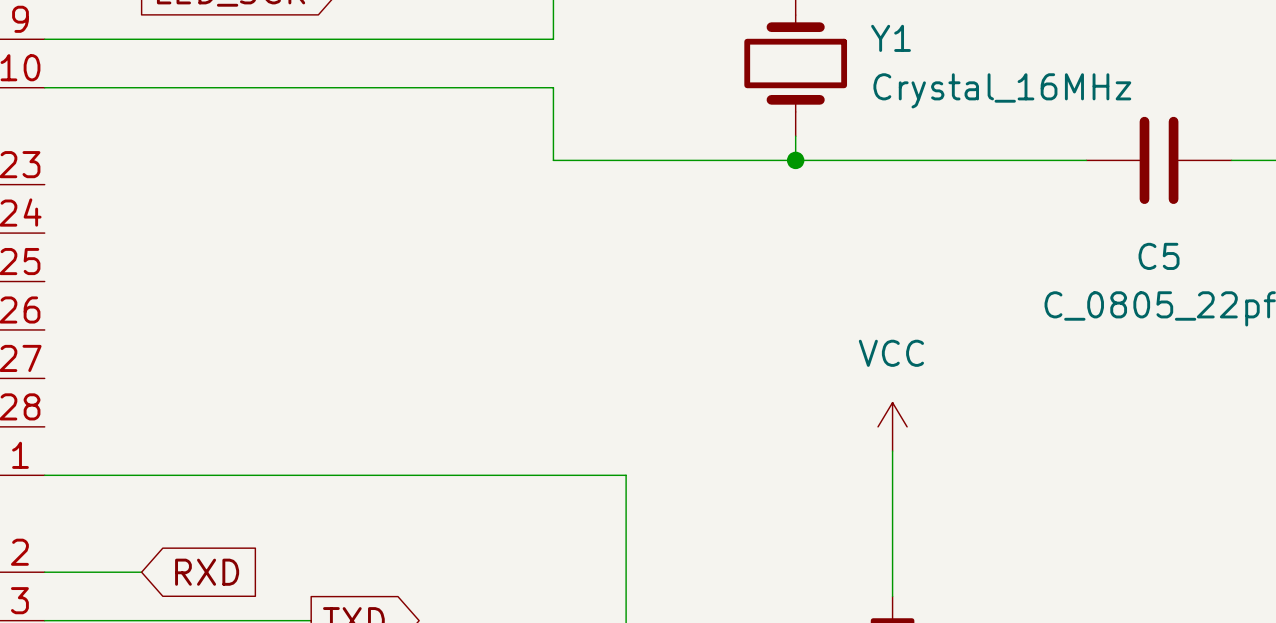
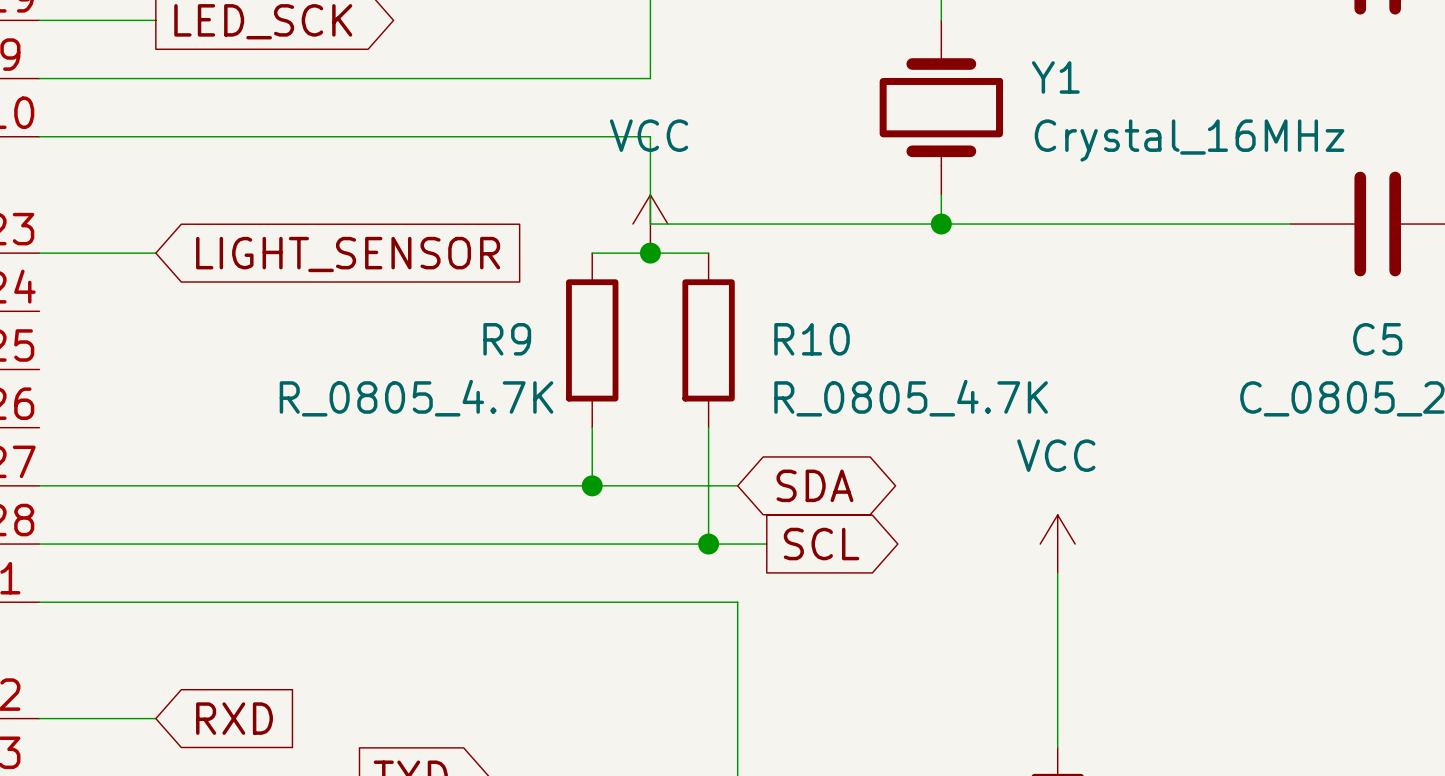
power symbol: none -> VCC (650, 224)
wire: none -> (39, 253) (155, 253)
wire: none -> (592, 253) (708, 253)
junction: none -> (650, 253)
global label: none -> LIGHT_SENSOR (348, 254)
R9: none -> R_0805_4.7K (592, 340)
R10: none -> R_0805_4.7K (708, 340)
wire: none -> (592, 427) (592, 485)
wire: none -> (708, 427) (708, 544)
wire: none -> (39, 485) (737, 485)
junction: none -> (592, 485)
global label: none -> SDA (814, 485)
wire: none -> (39, 544) (766, 544)
junction: none -> (708, 544)
global label: none -> SCL (821, 544)

